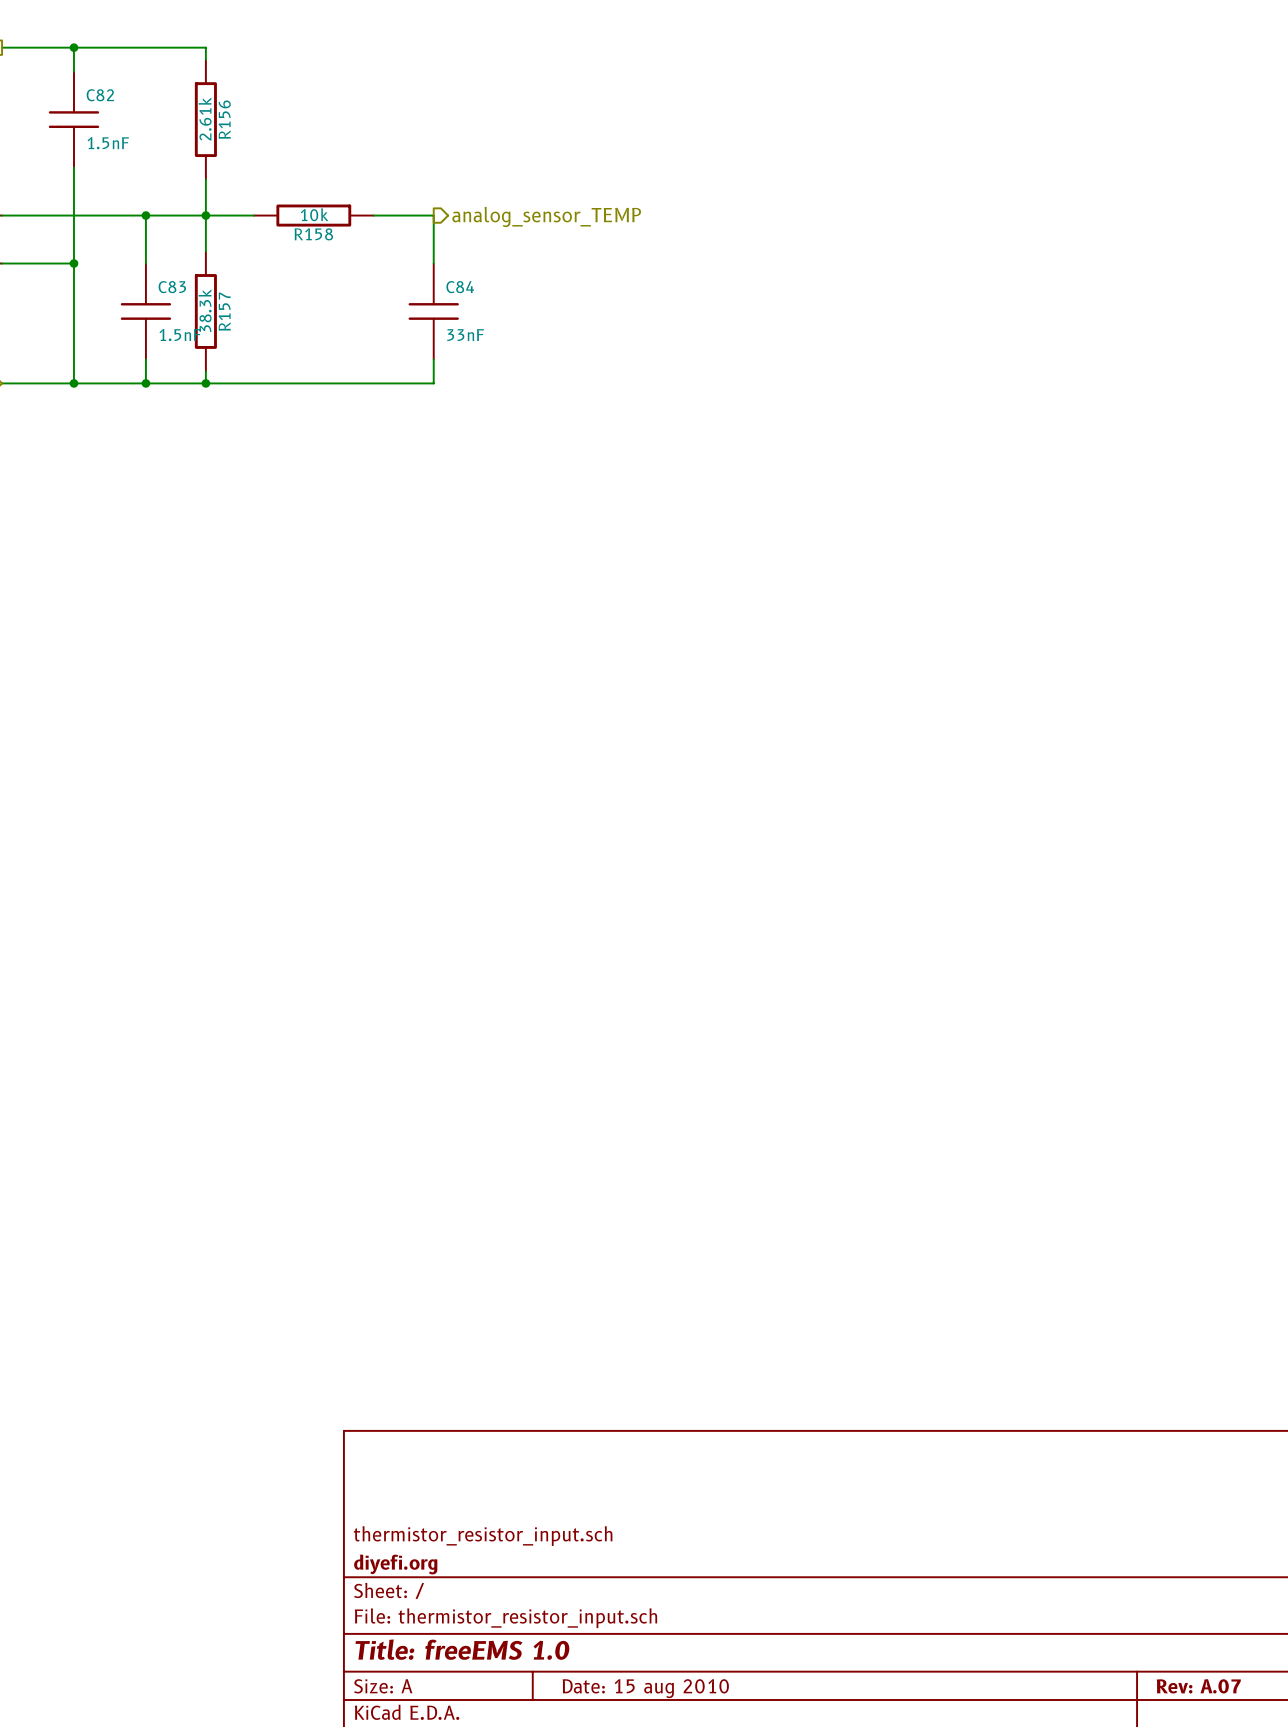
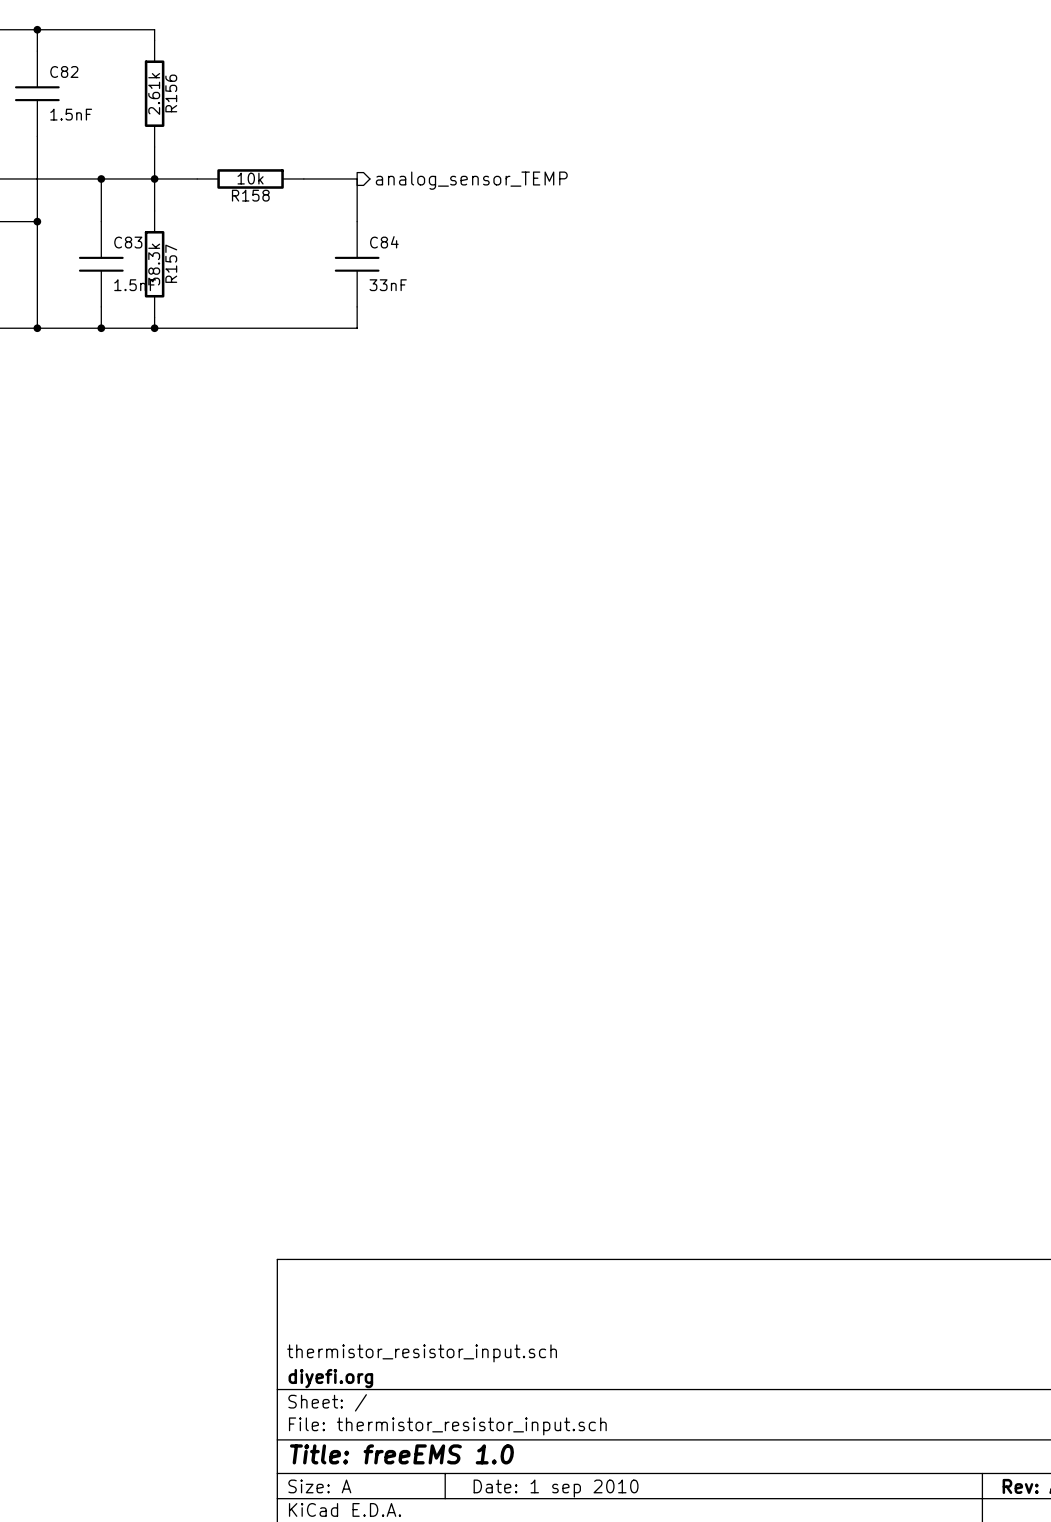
title block: Date: 15 aug 2010 (645, 1688) -> Date: 1 sep 2010 (556, 1488)

